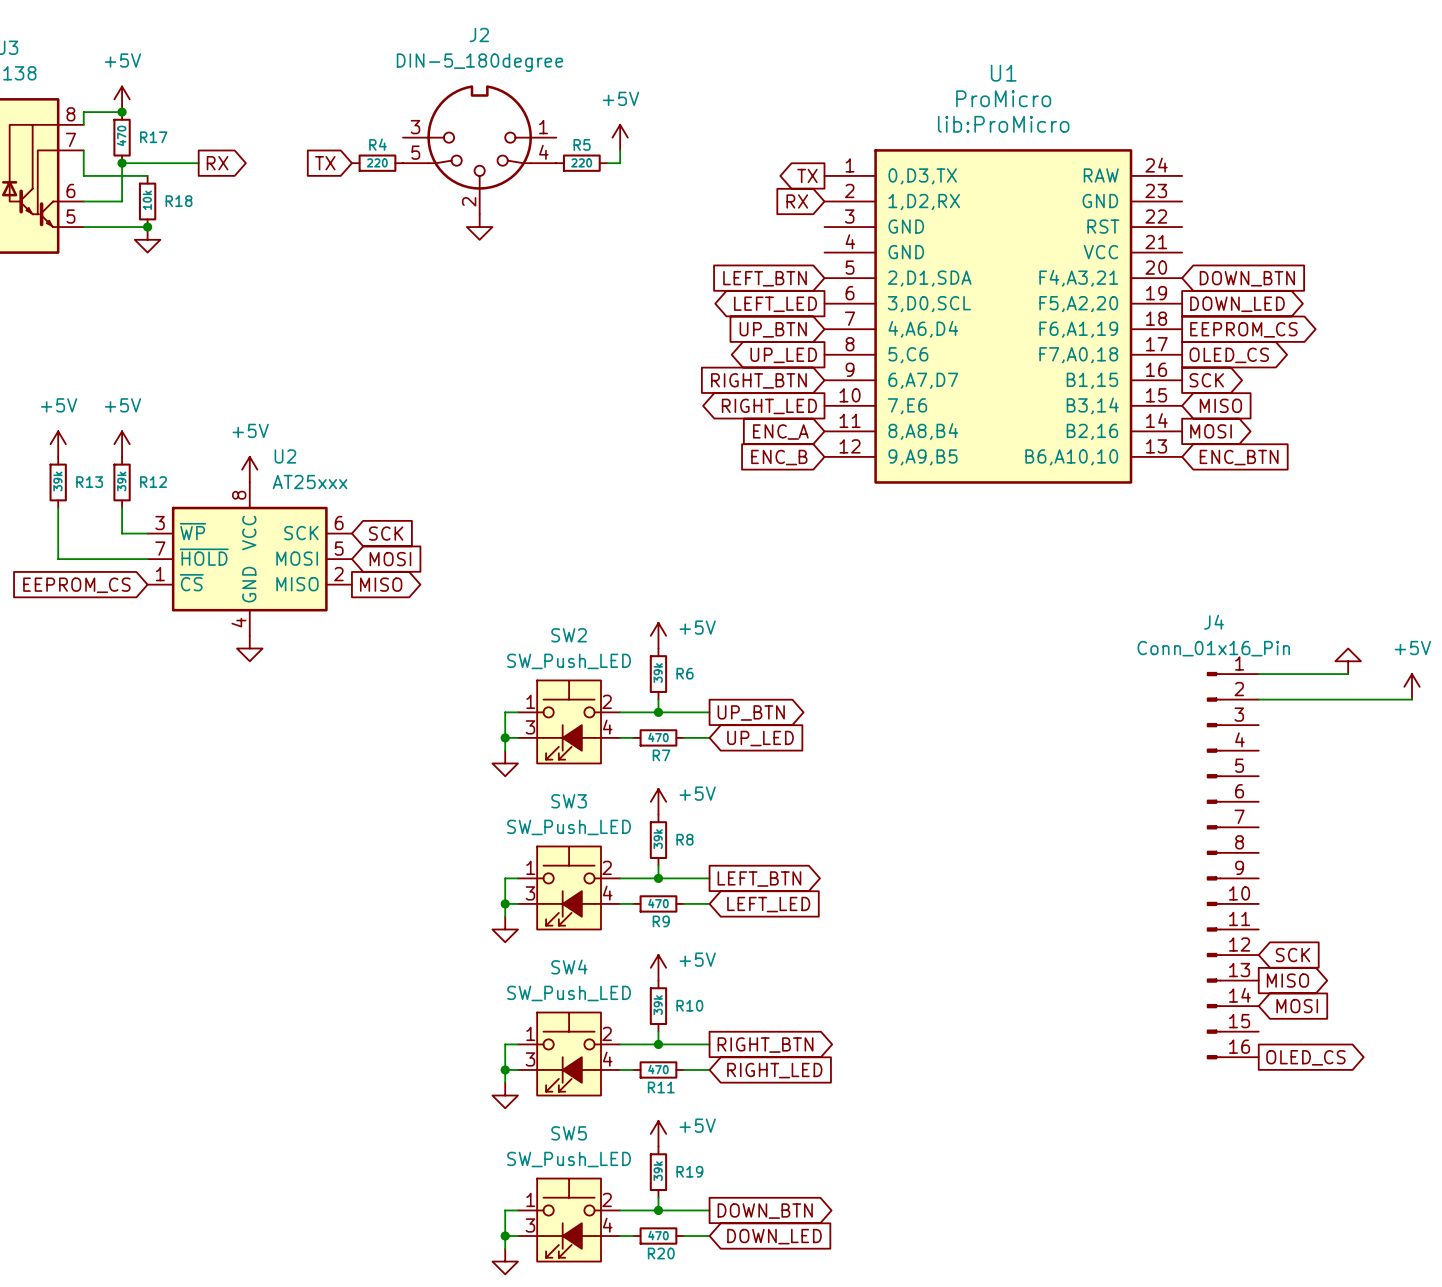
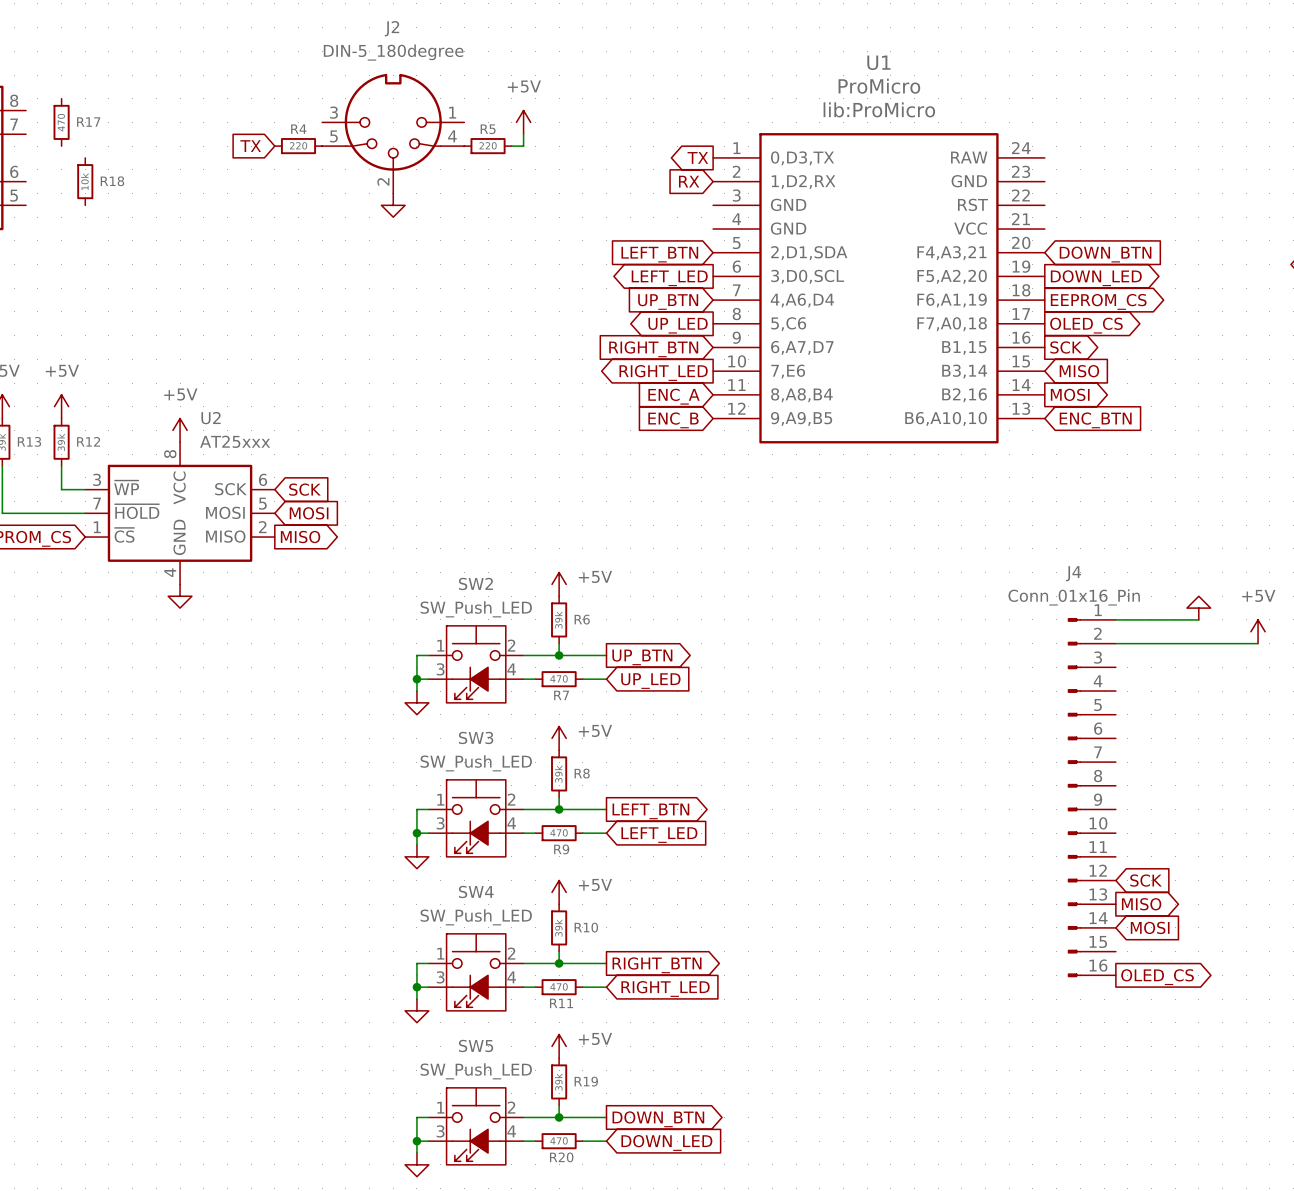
power symbol: +5V (122, 99) -> none
wire: (122, 112) (83, 112) (83, 124) -> none
junction: (122, 112) -> none
wire: (83, 150) (83, 175) (147, 175) -> none
junction: (122, 163) -> none
wire: (198, 163) (122, 163) (122, 201) (83, 201) -> none
global label: RX (217, 163) -> none
wire: (83, 227) (147, 227) -> none
junction: (147, 227) -> none
power symbol: (147, 239) -> none

